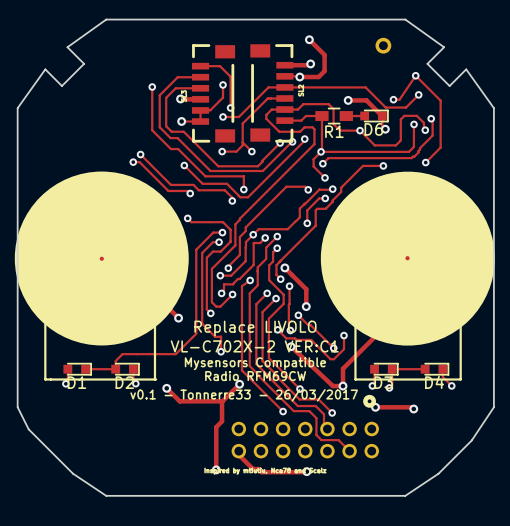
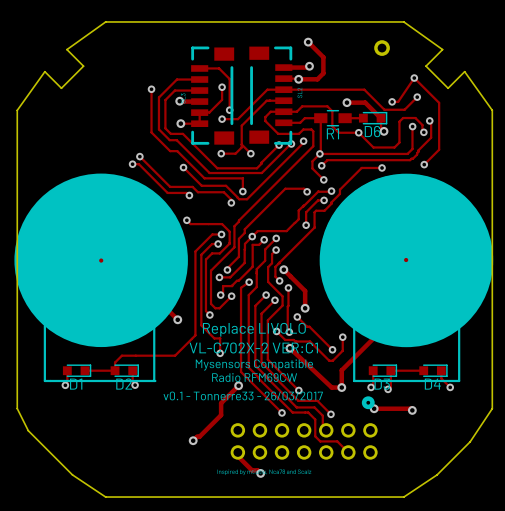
track: (166, 388) (179, 401) (222, 401) -> none
via: (166, 388) -> none
track: (222, 413) (222, 421) (216, 427) (216, 469) -> (221, 415) (193, 440)
via: none -> (193, 440)
via: (216, 469) -> none
track: (306, 471) (261, 472) -> none
via: (306, 471) -> none
via: none -> (260, 473)

